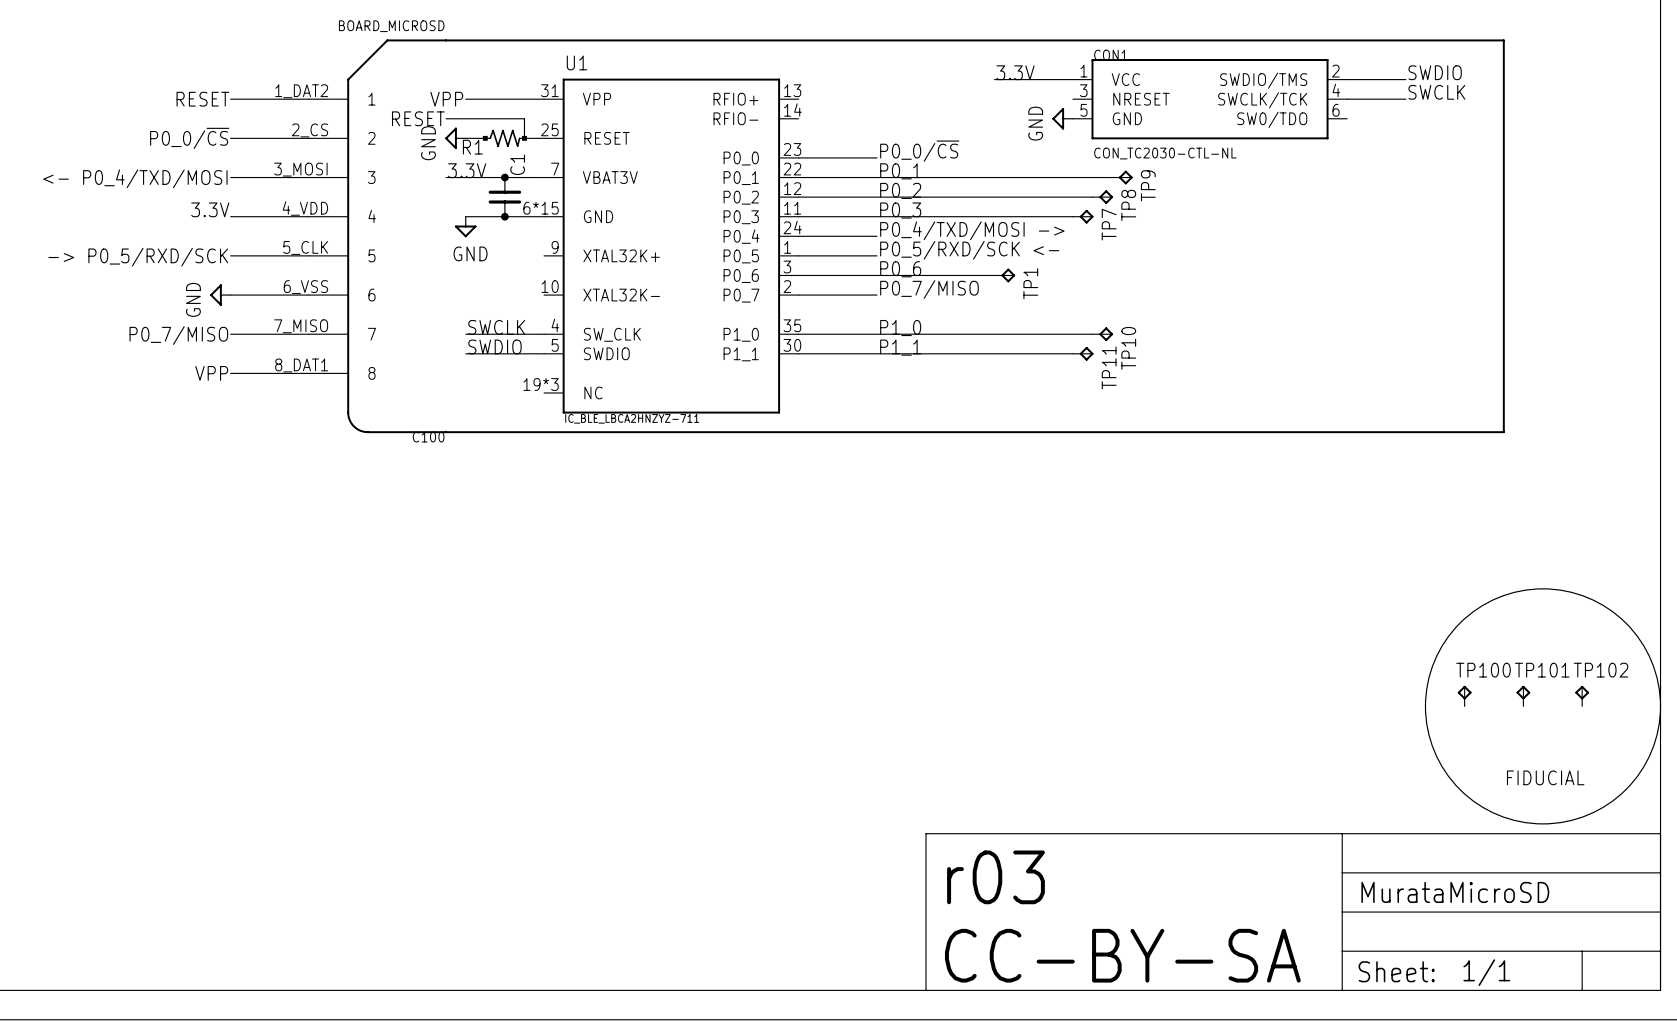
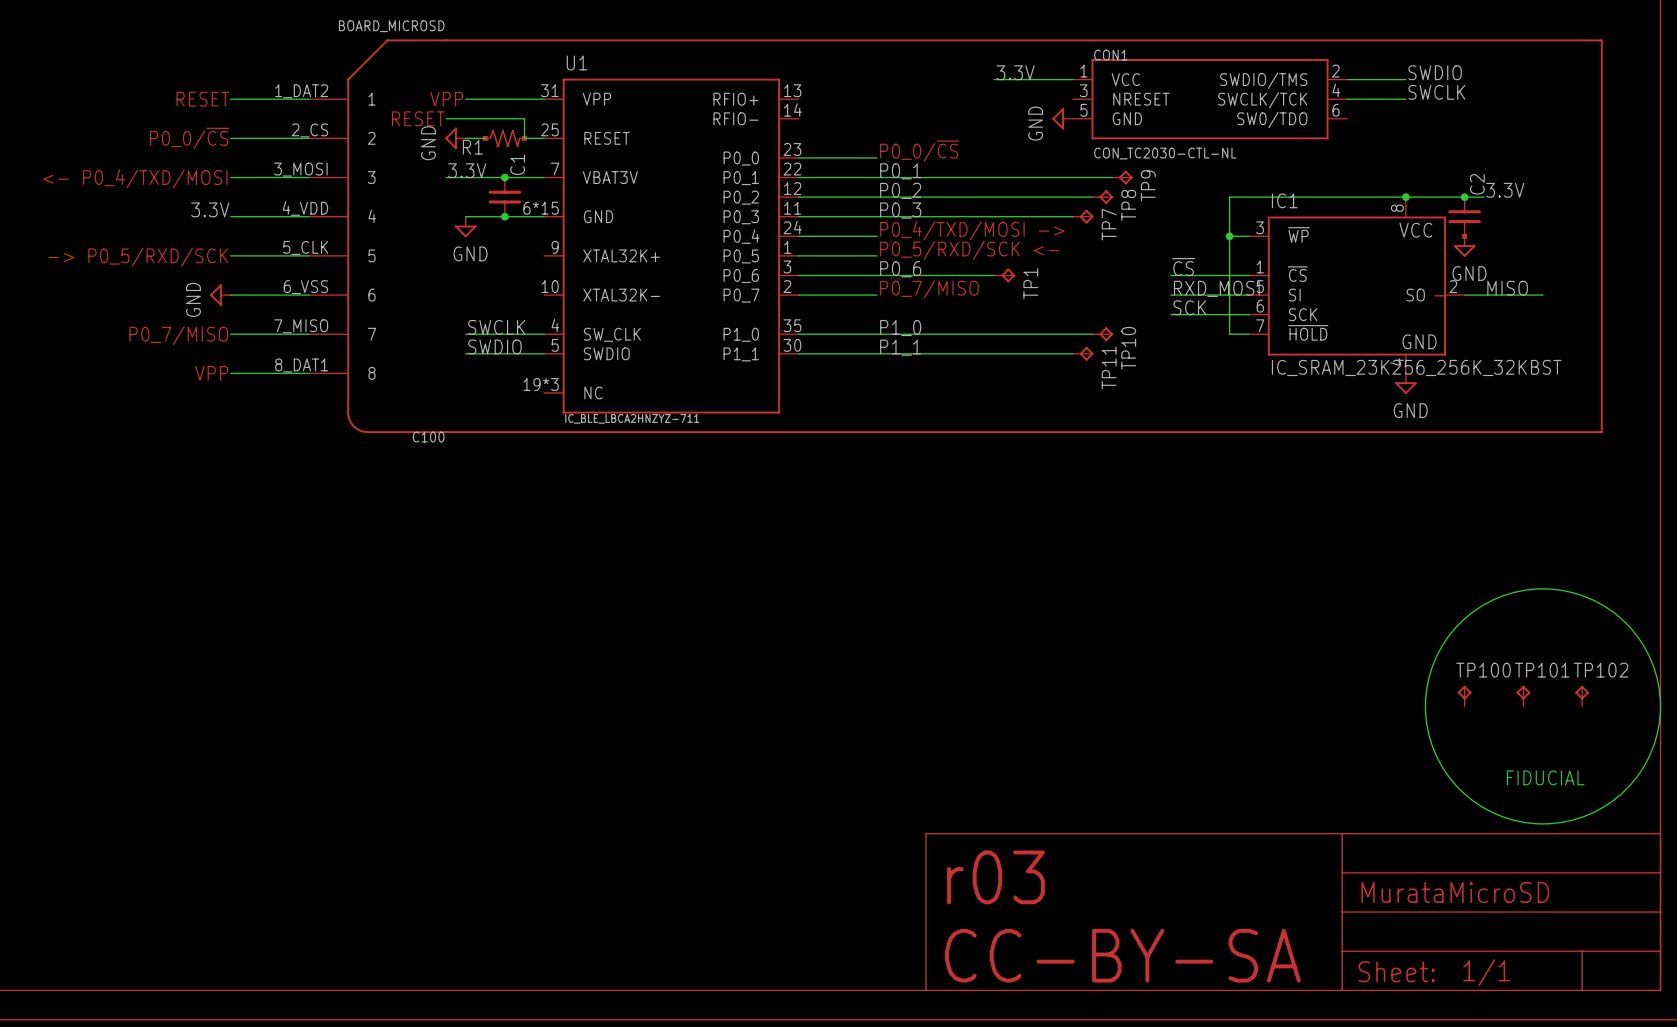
line: (1503, 40) (1503, 432) -> (1503, 40) (1601, 40) (1601, 432) (1503, 432)
label: none -> 3.3V (1505, 190)
junction: none -> (1405, 197)
junction: none -> (1464, 197)
wire: none -> (1484, 197) (1229, 197) (1229, 334) (1249, 334)
C2: none -> (1464, 216)
wire: none -> (1229, 236) (1249, 236)
junction: none -> (1229, 236)
power symbol: none -> GND (1464, 246)
label: none -> ~{CS} (1183, 267)
wire: none -> (1170, 275) (1249, 275)
IC1: none -> IC_SRAM_23K256_256K_32KBST (1356, 285)
label: none -> RXD_MOSI (1216, 288)
label: none -> MISO (1507, 288)
wire: none -> (1170, 295) (1249, 295)
wire: none -> (1464, 295) (1543, 295)
label: none -> SCK (1189, 307)
wire: none -> (1170, 314) (1249, 314)
power symbol: none -> GND (1405, 383)

